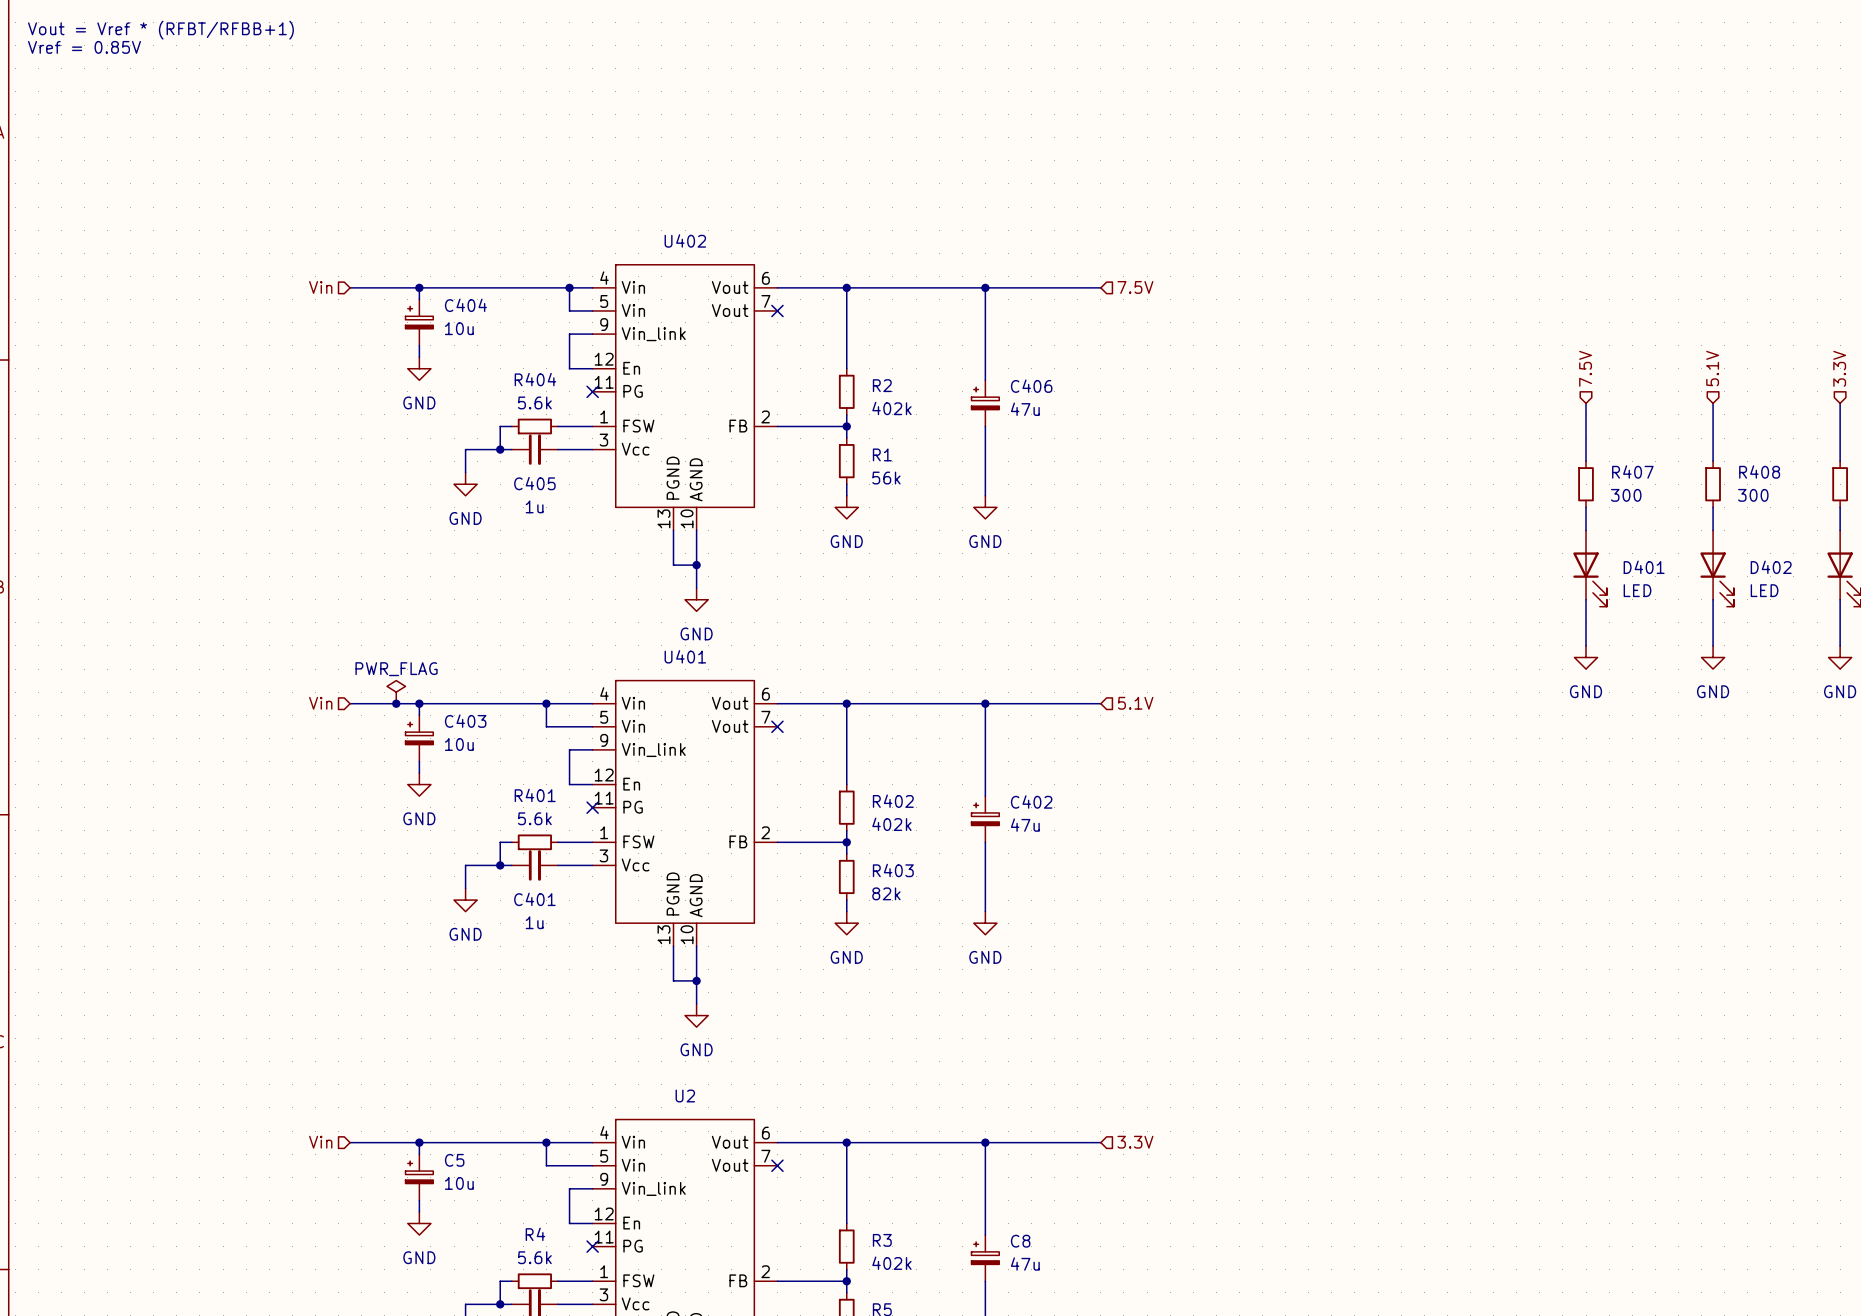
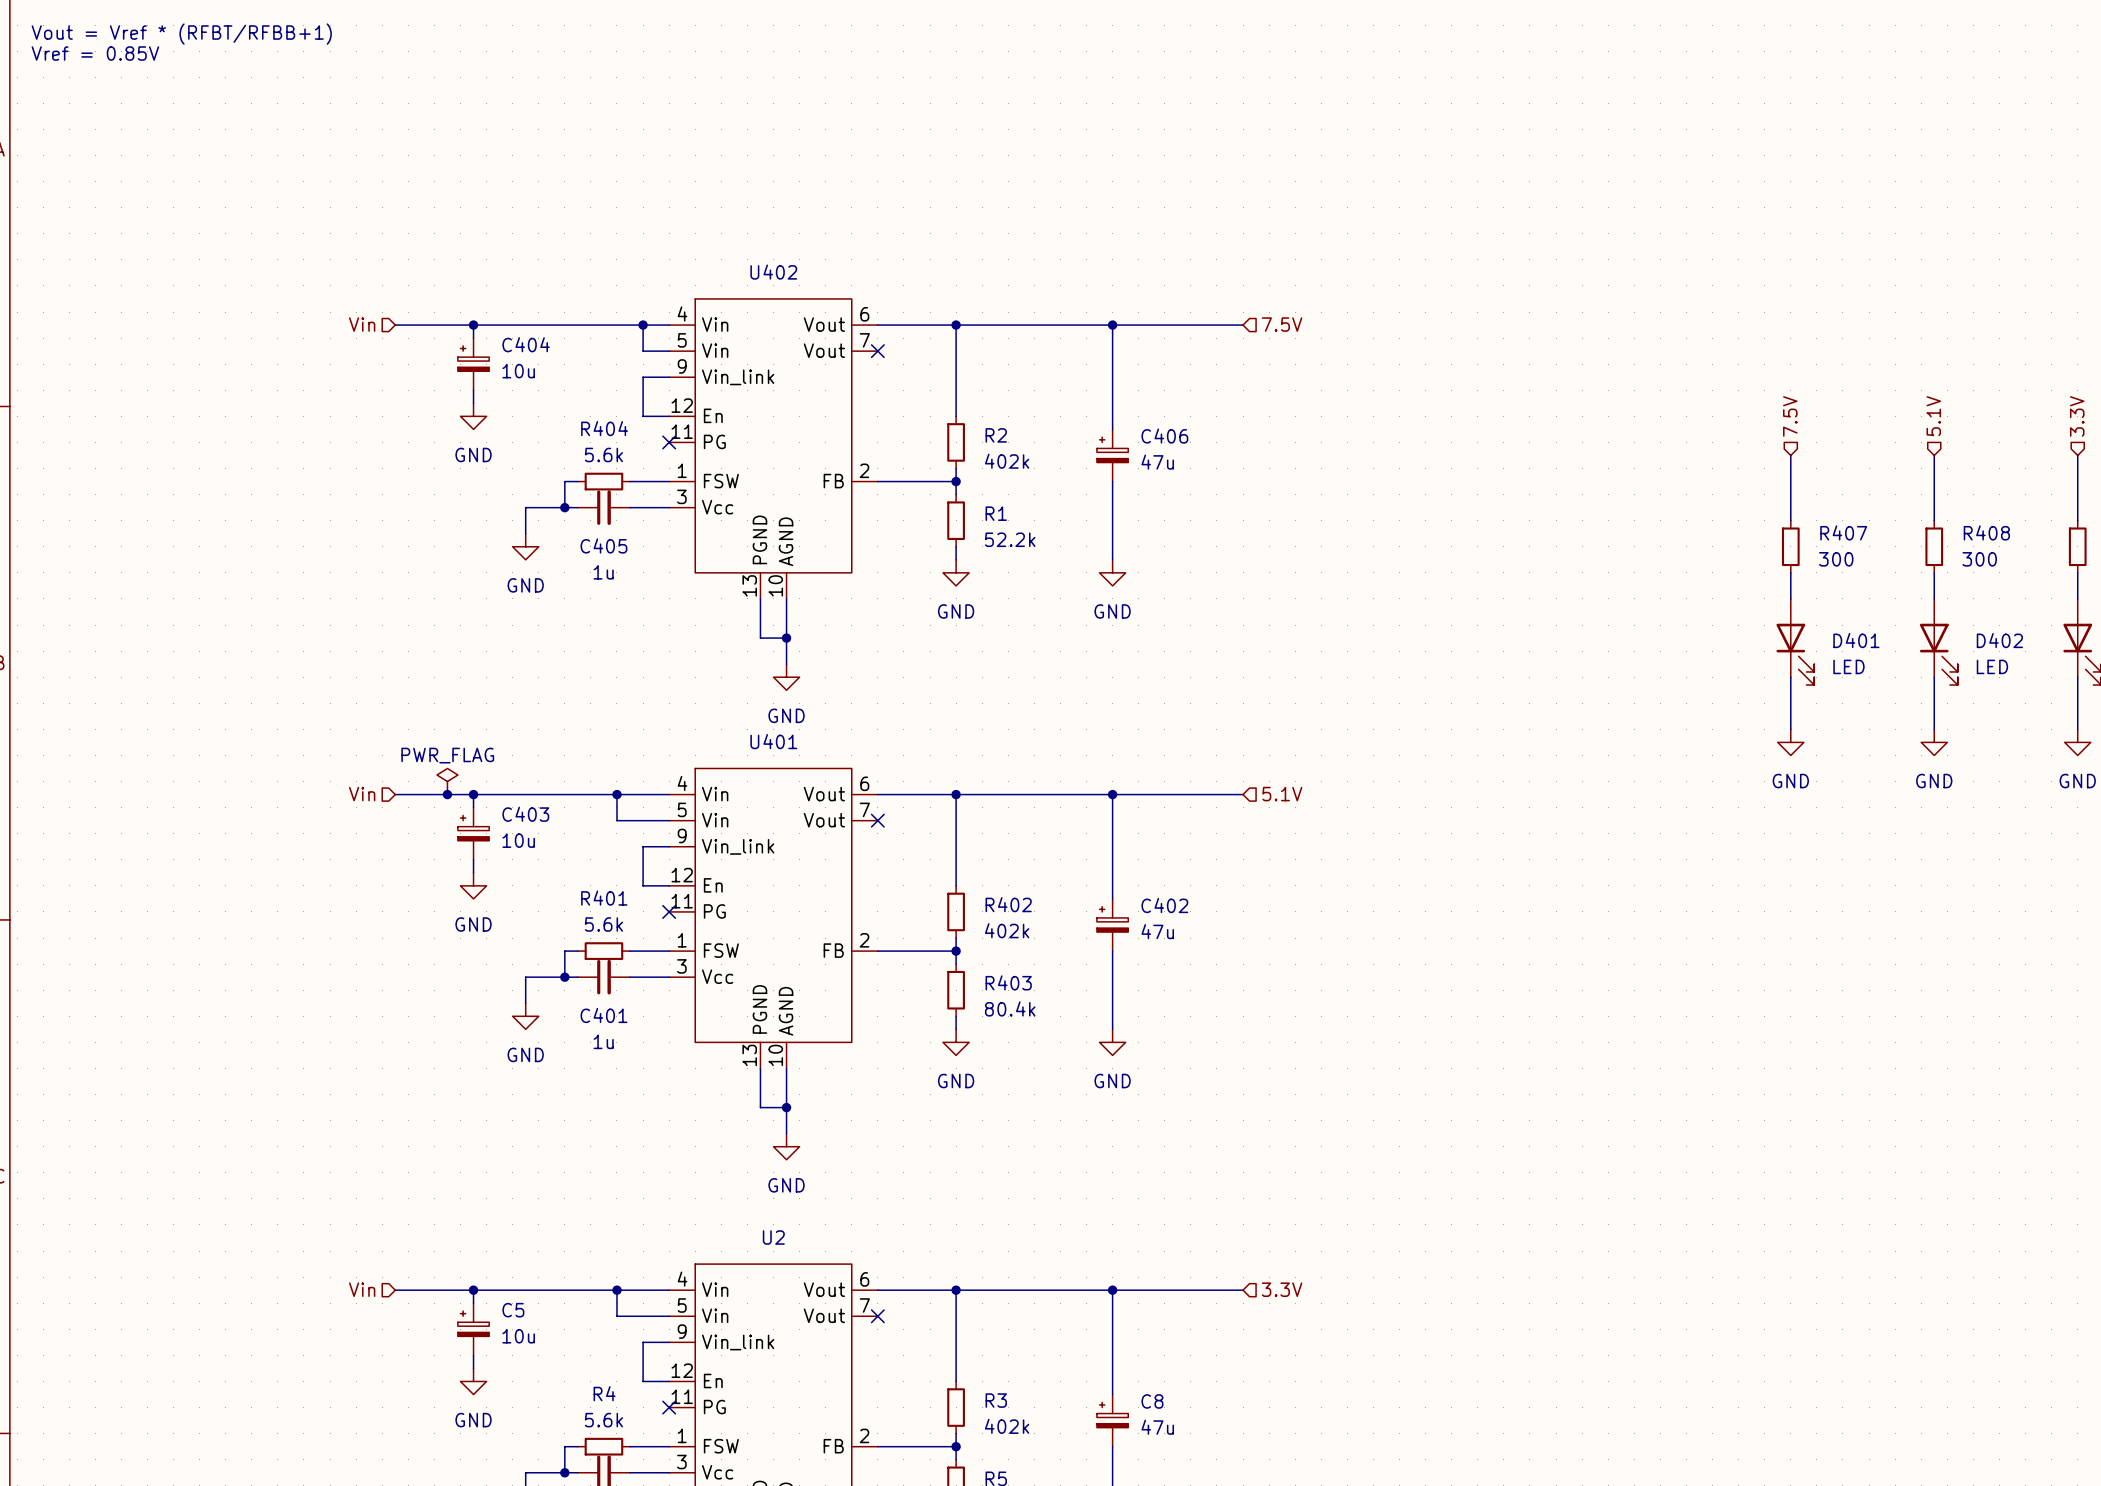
R1 value: 56k (886, 478) -> 52.2k (1010, 539)
R403 value: 82k (886, 893) -> 80.4k (1010, 1008)

